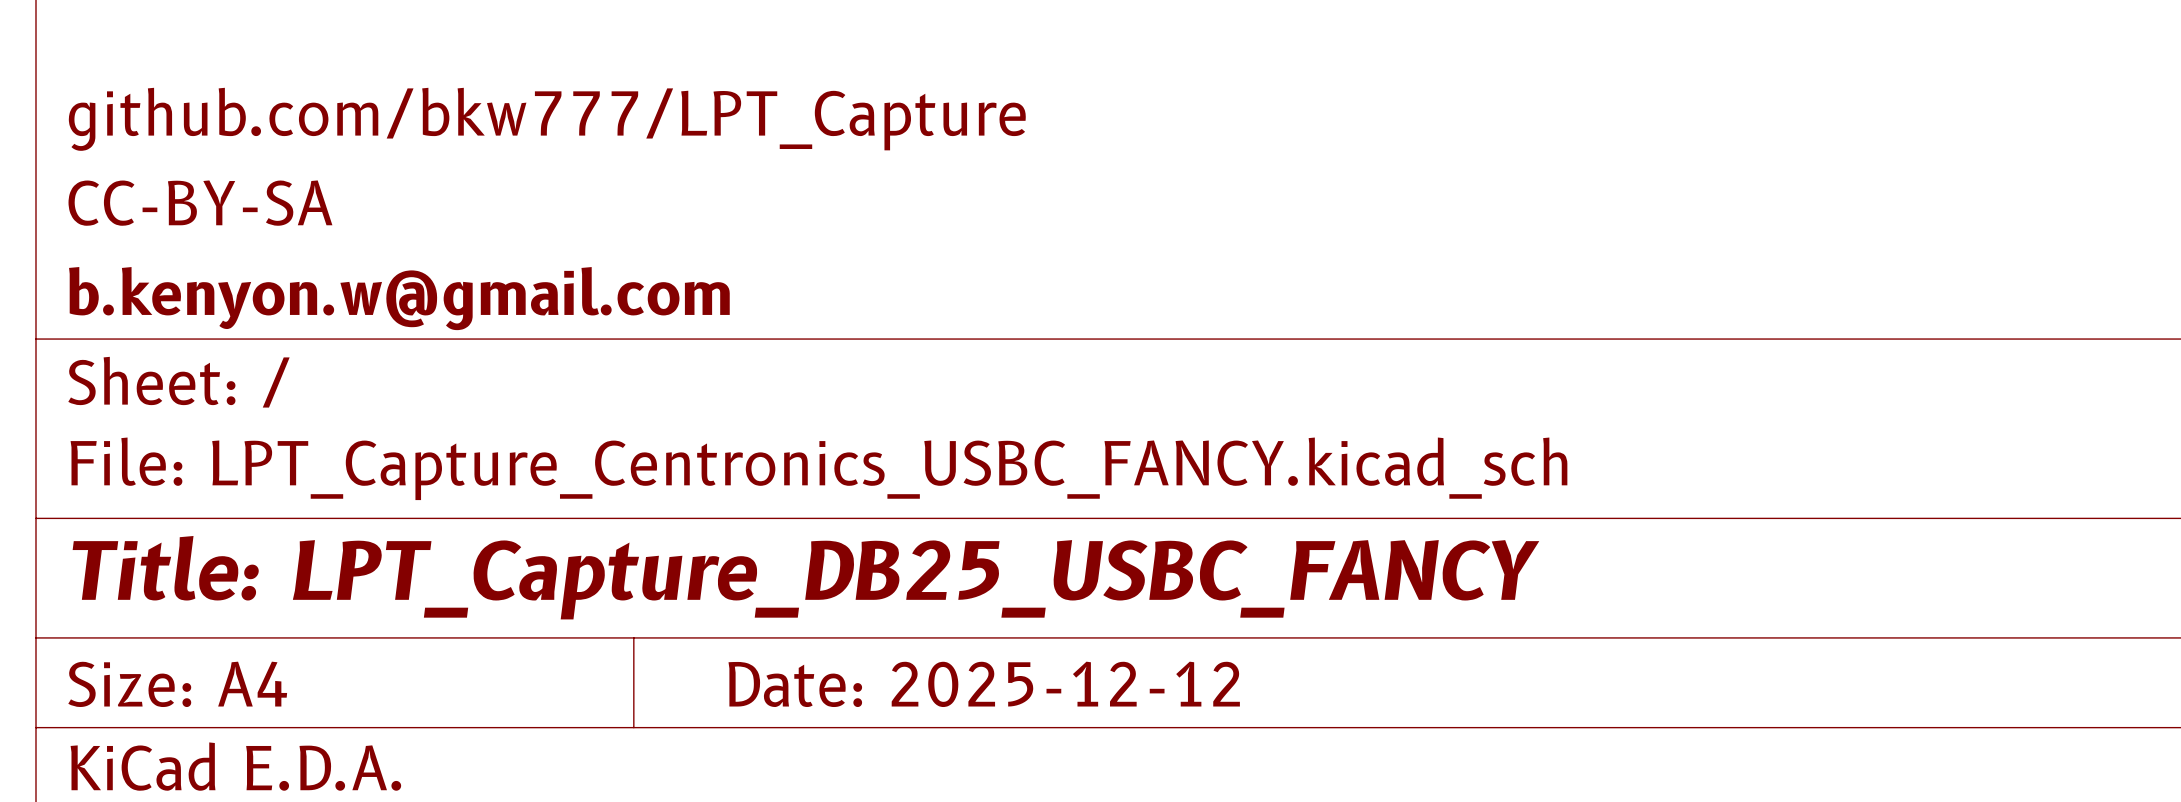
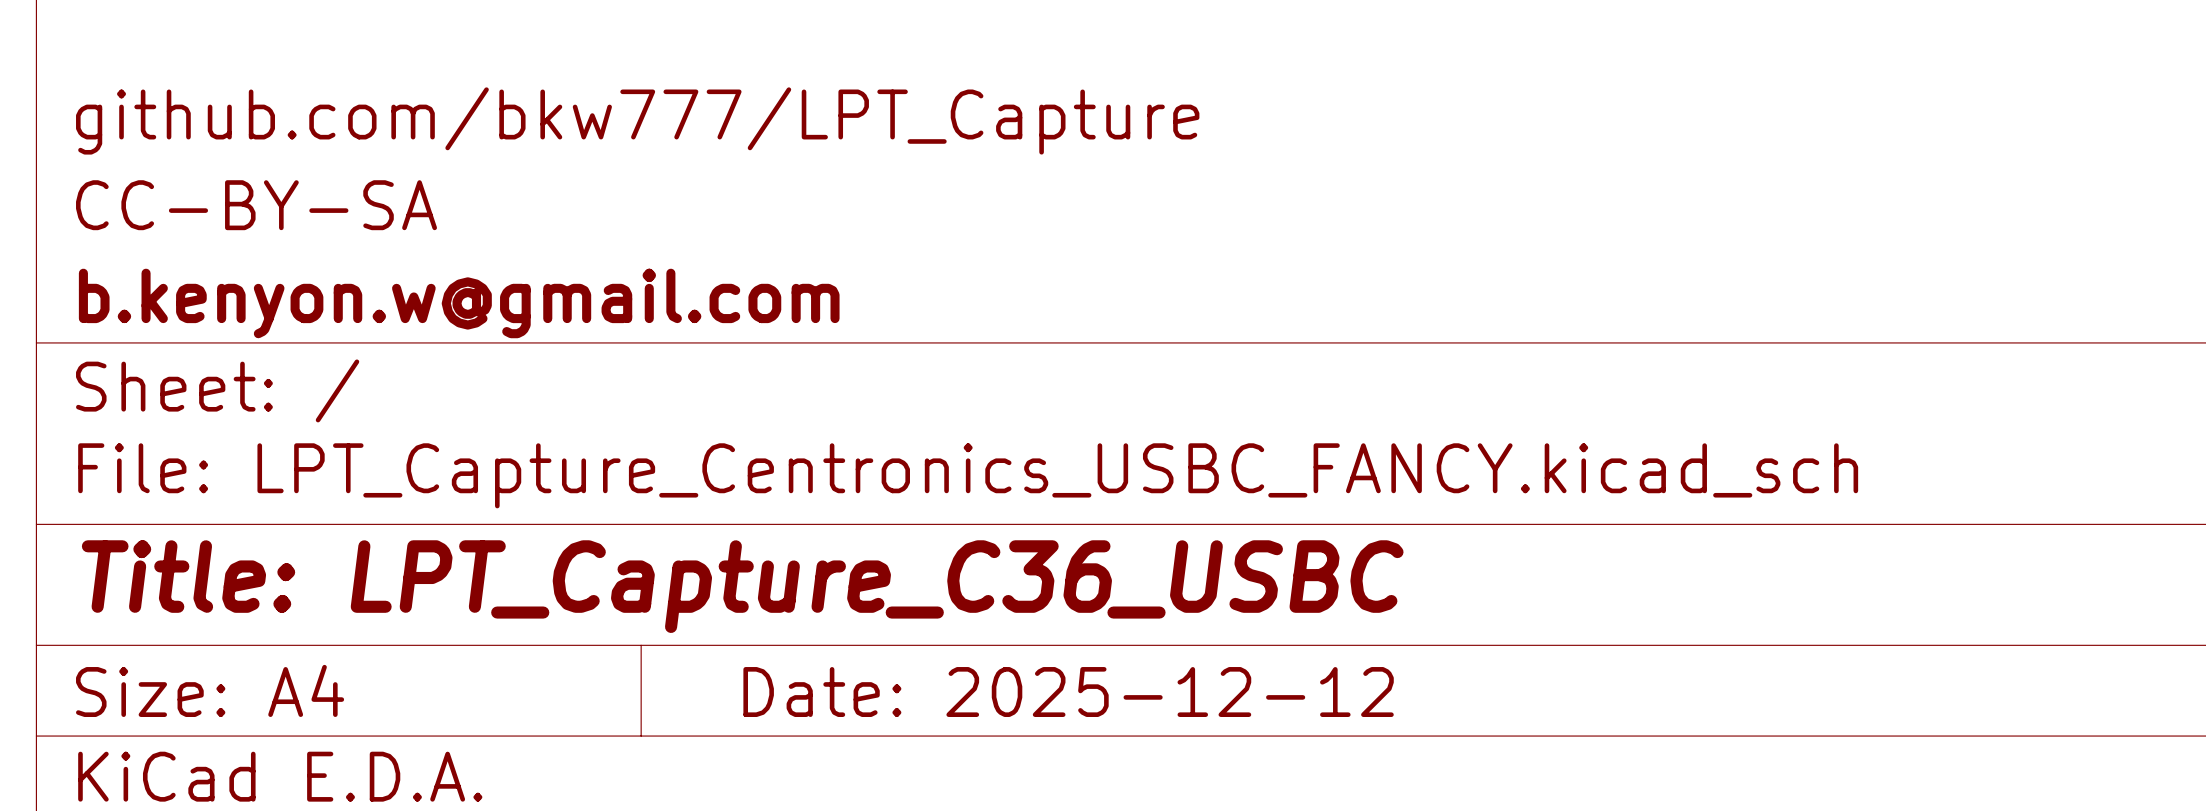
title block: Title: LPT_Capture_DB25_USBC_FANCY (805, 577) -> Title: LPT_Capture_C36_USBC (742, 586)

